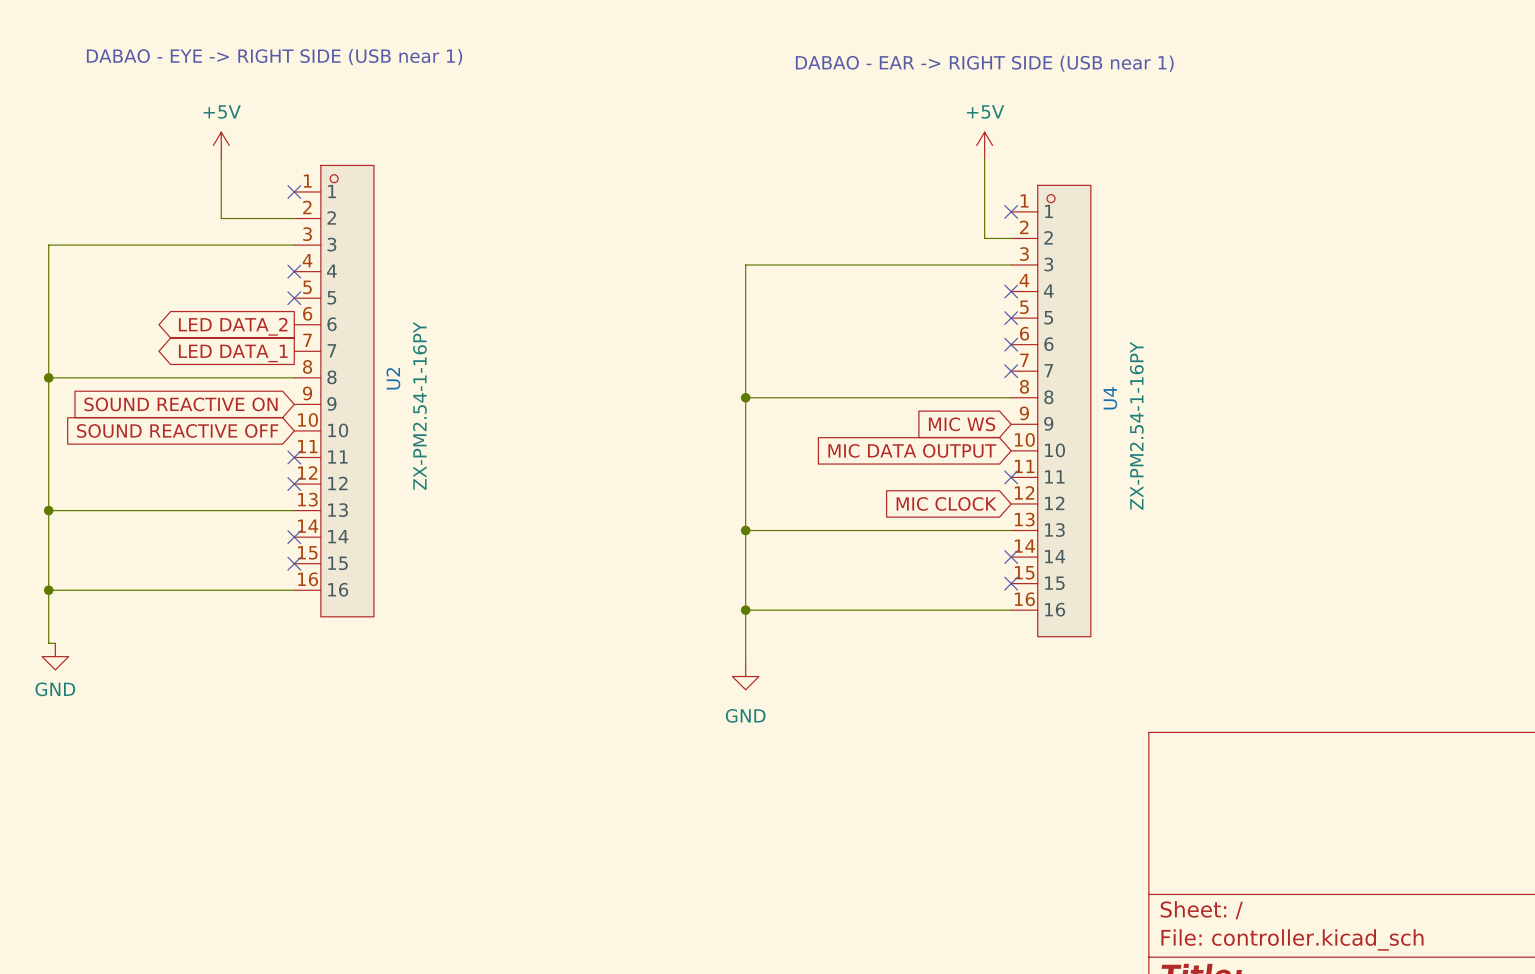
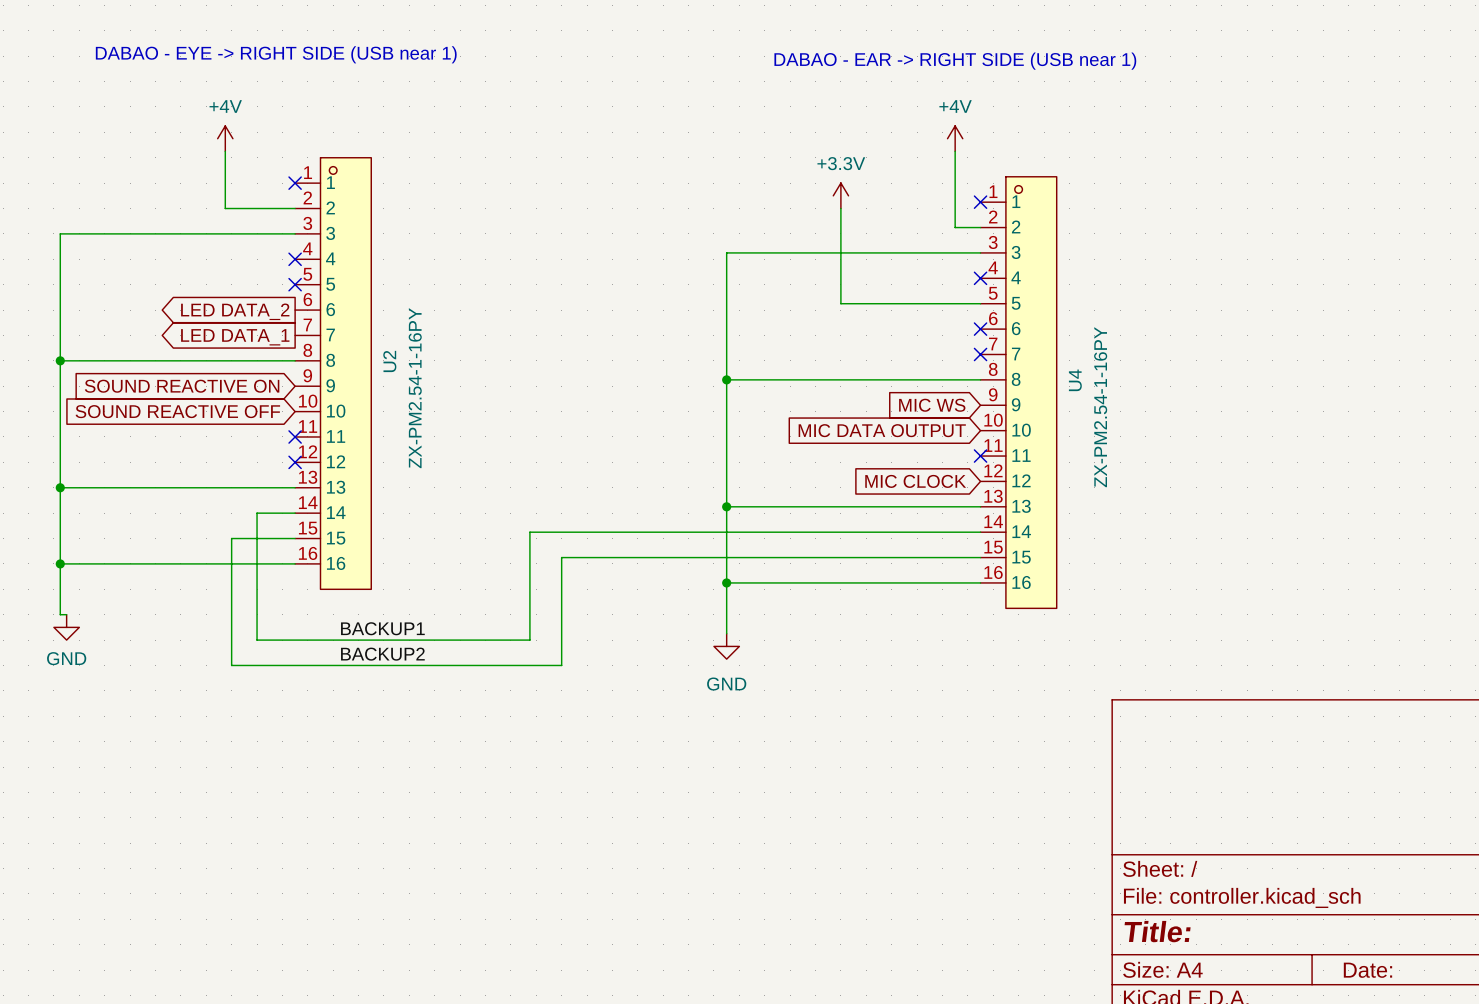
power symbol: +5V (221, 145) -> +4V (225, 138)
power symbol: +5V (984, 145) -> +4V (955, 138)
power symbol: none -> +3.3V (840, 195)
wire: none -> (840, 208) (840, 303) (980, 303)
no-connect mark: (1011, 318) -> none
wire: none -> (295, 513) (257, 513) (257, 640) (529, 640) (529, 532) (980, 532)
no-connect mark: (294, 537) -> none
no-connect mark: (1011, 557) -> none
wire: none -> (295, 538) (231, 538) (231, 665) (561, 665) (561, 557) (980, 557)
no-connect mark: (294, 563) -> none
no-connect mark: (1011, 583) -> none
label: none -> BACKUP1 (382, 628)
label: none -> BACKUP2 (382, 654)

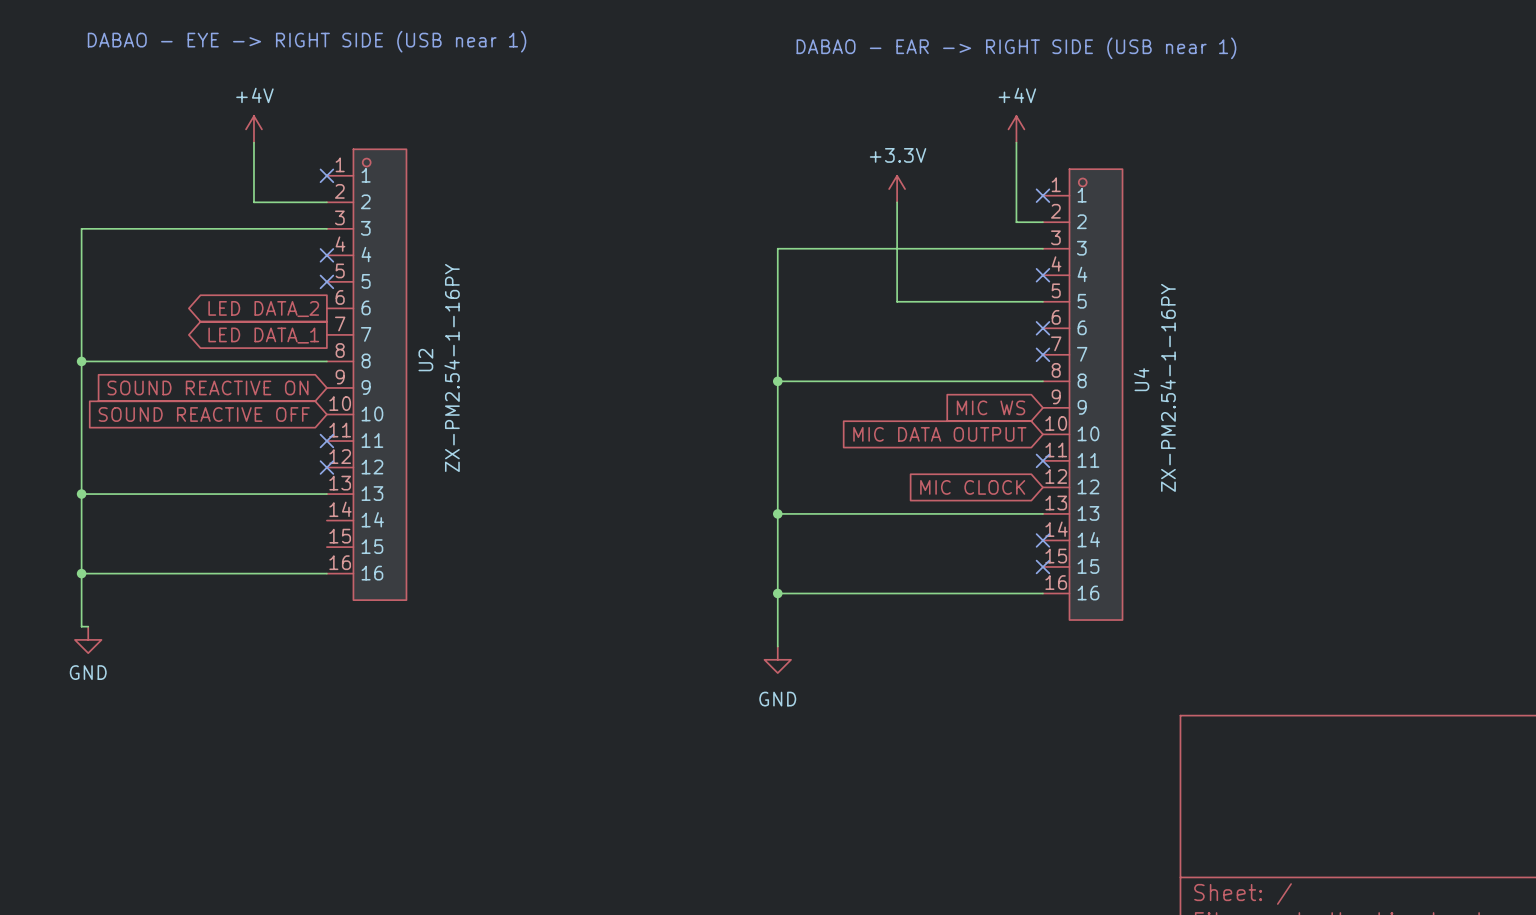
wire: (295, 513) (257, 513) (257, 640) (529, 640) (529, 532) (980, 532) -> none
no-connect mark: none -> (1042, 540)
wire: (295, 538) (231, 538) (231, 665) (561, 665) (561, 557) (980, 557) -> none
no-connect mark: none -> (1042, 566)
label: BACKUP1 (382, 628) -> none
label: BACKUP2 (382, 654) -> none

